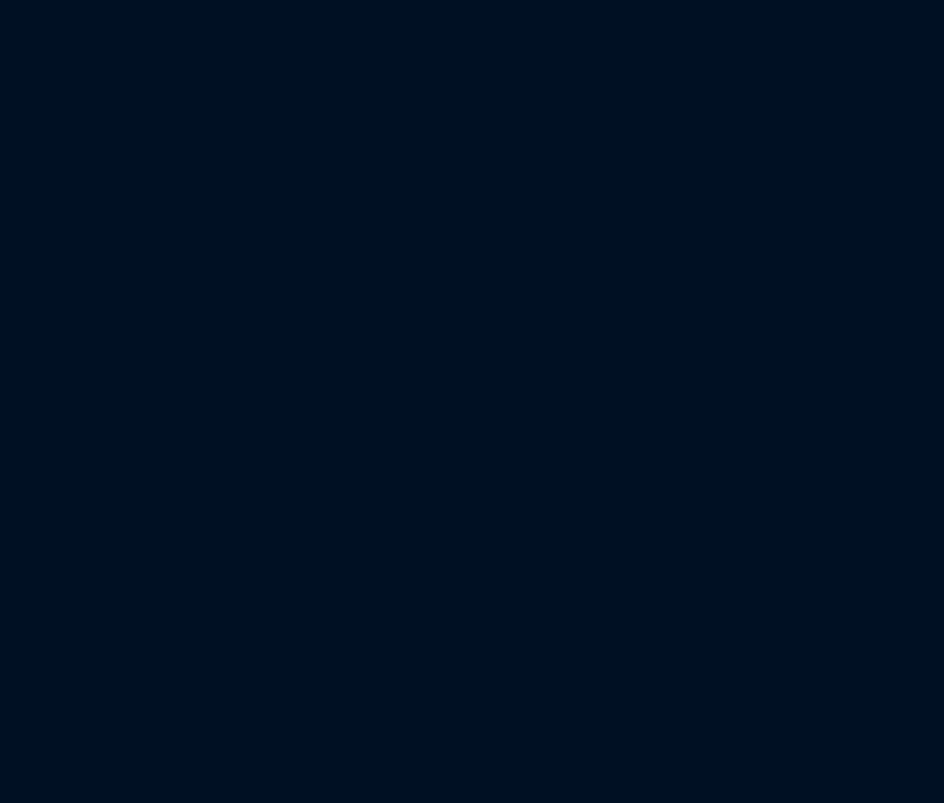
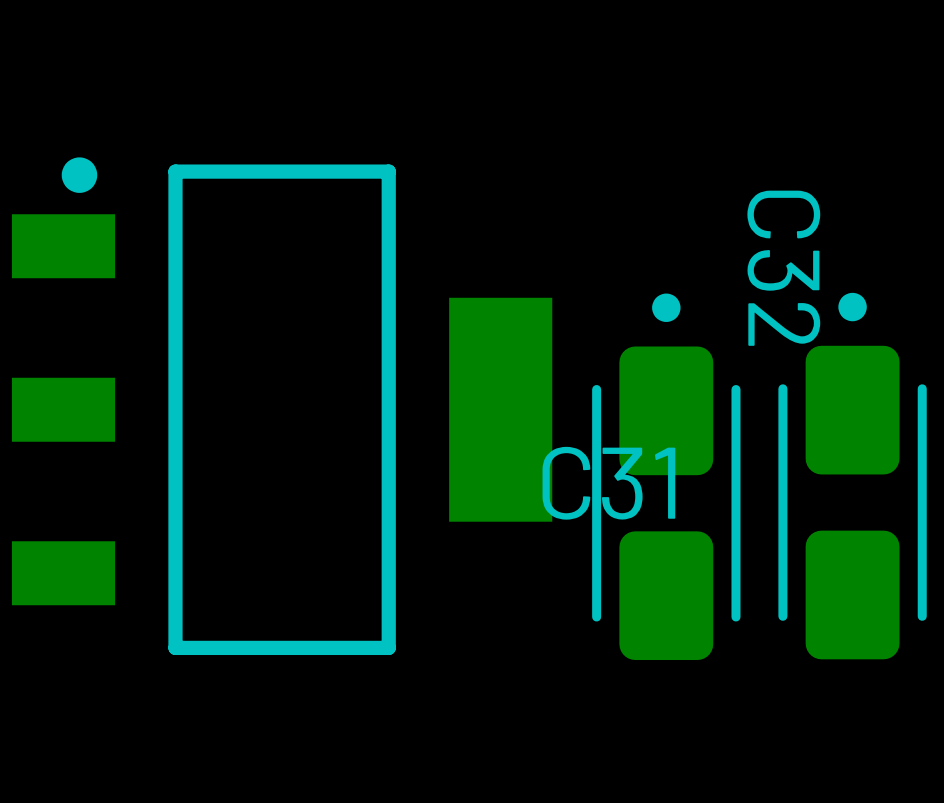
part: none -> (282, 406)
C32: none -> (666, 476)
C31: none -> (852, 476)

